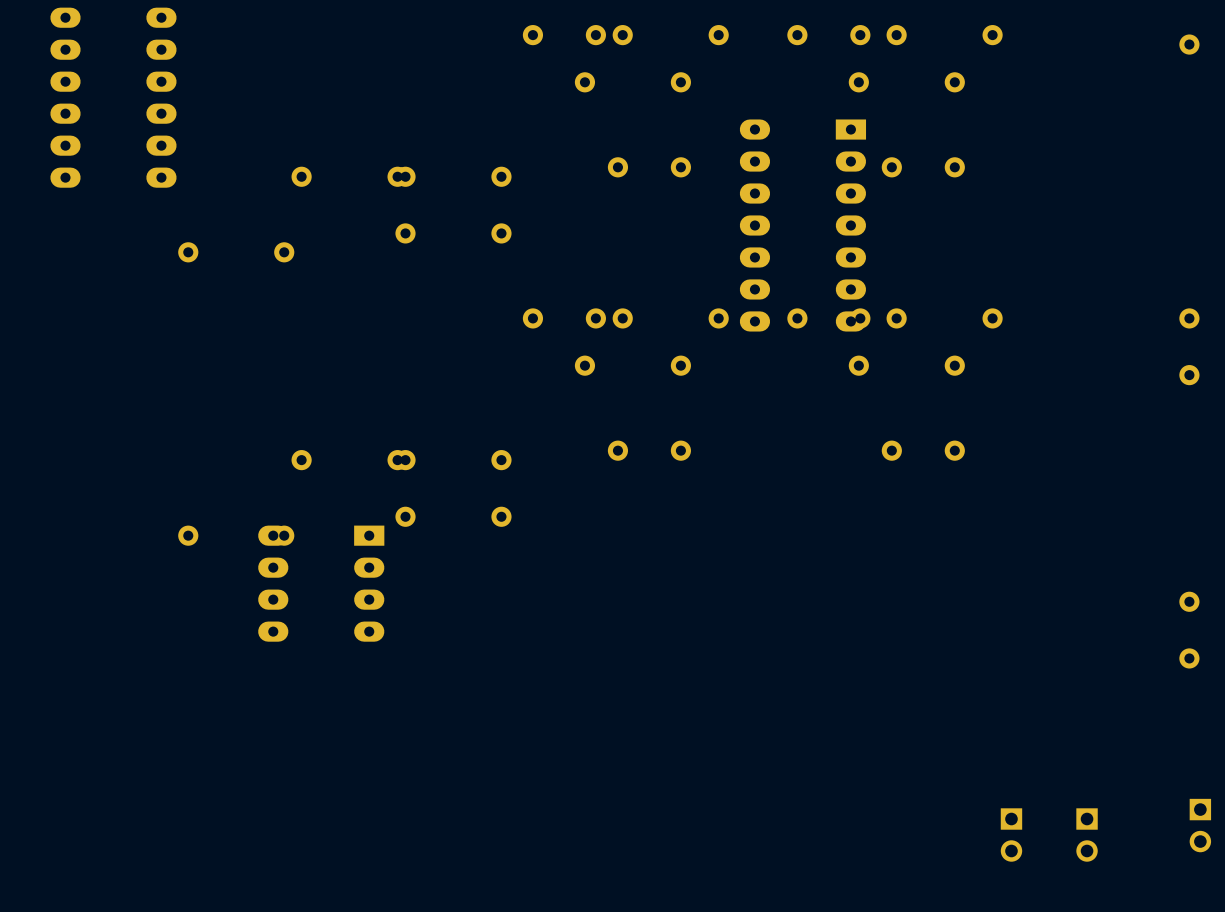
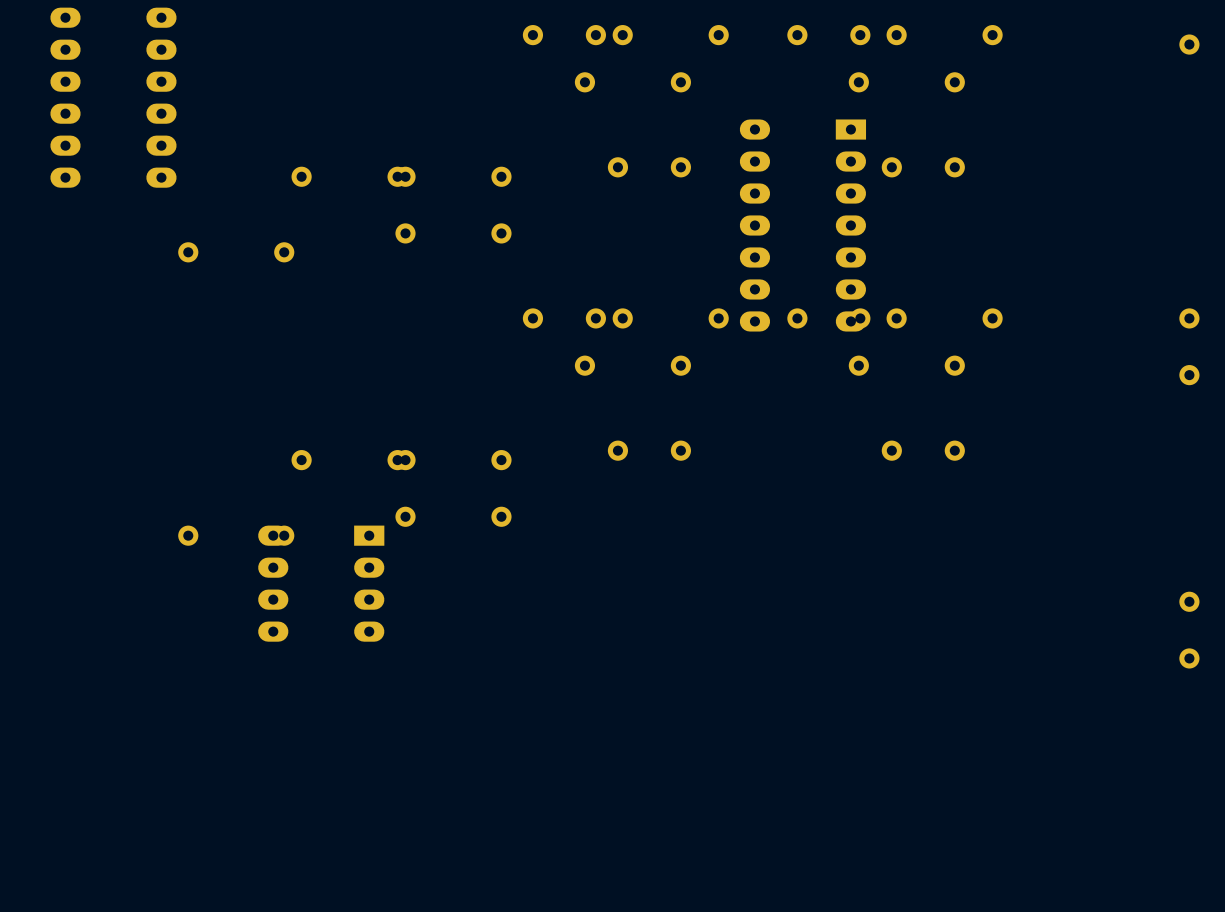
part: (1200, 825) -> none
part: (1011, 835) -> none
part: (1087, 835) -> none

